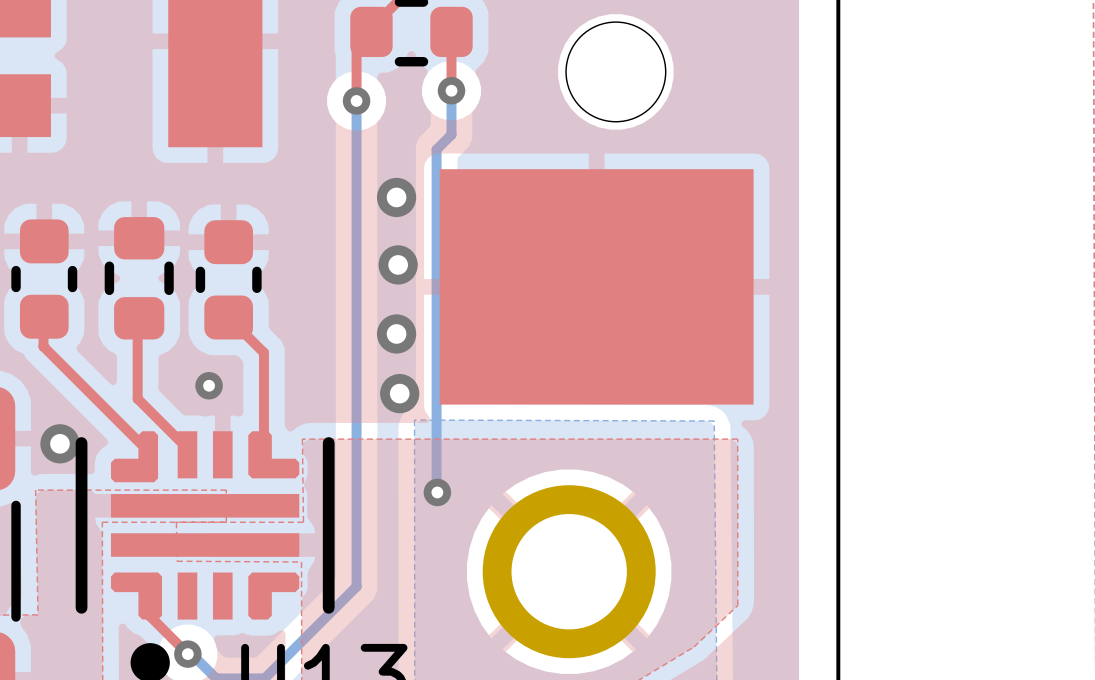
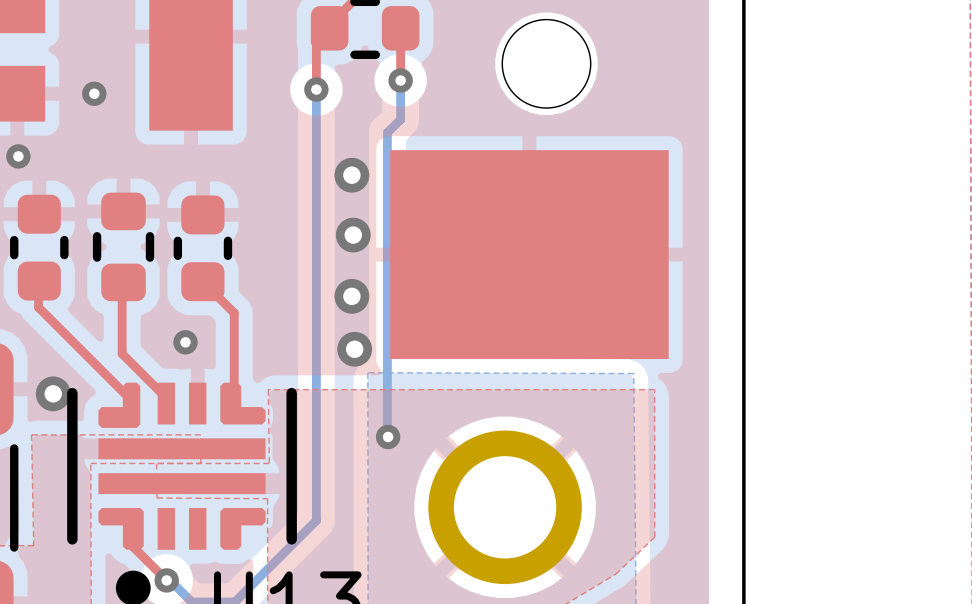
via: none -> (94, 93)
via: none -> (18, 156)

